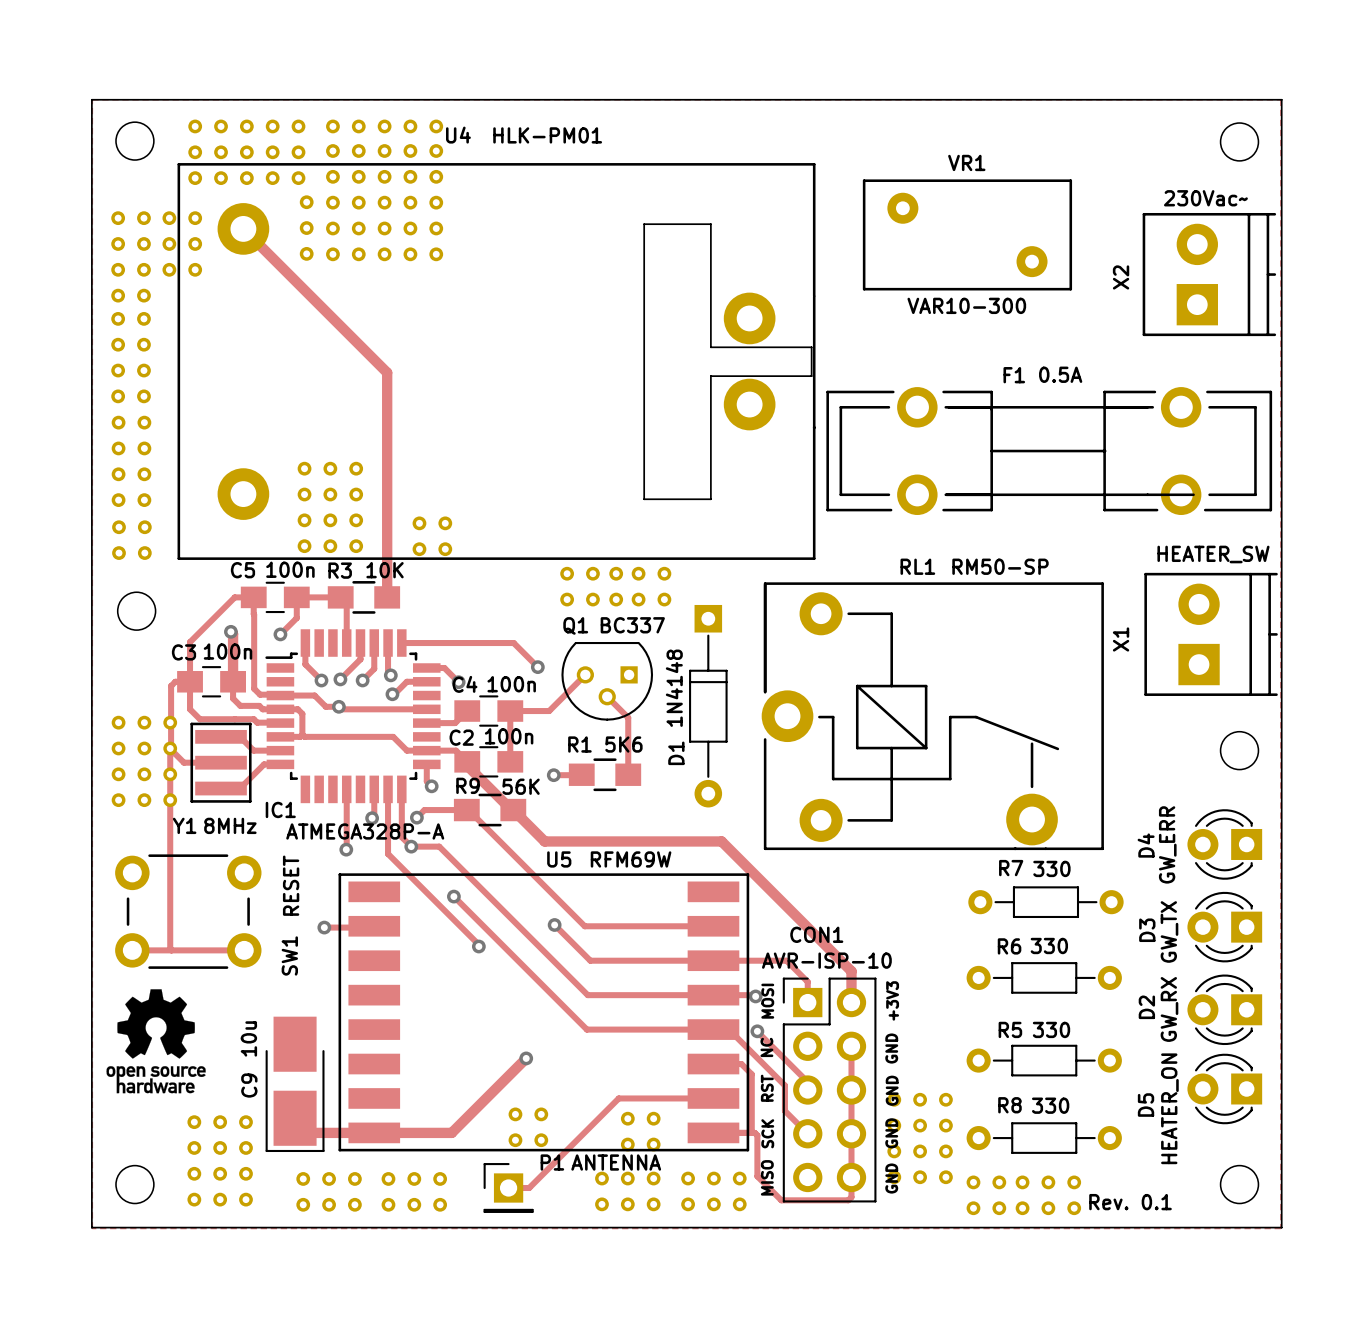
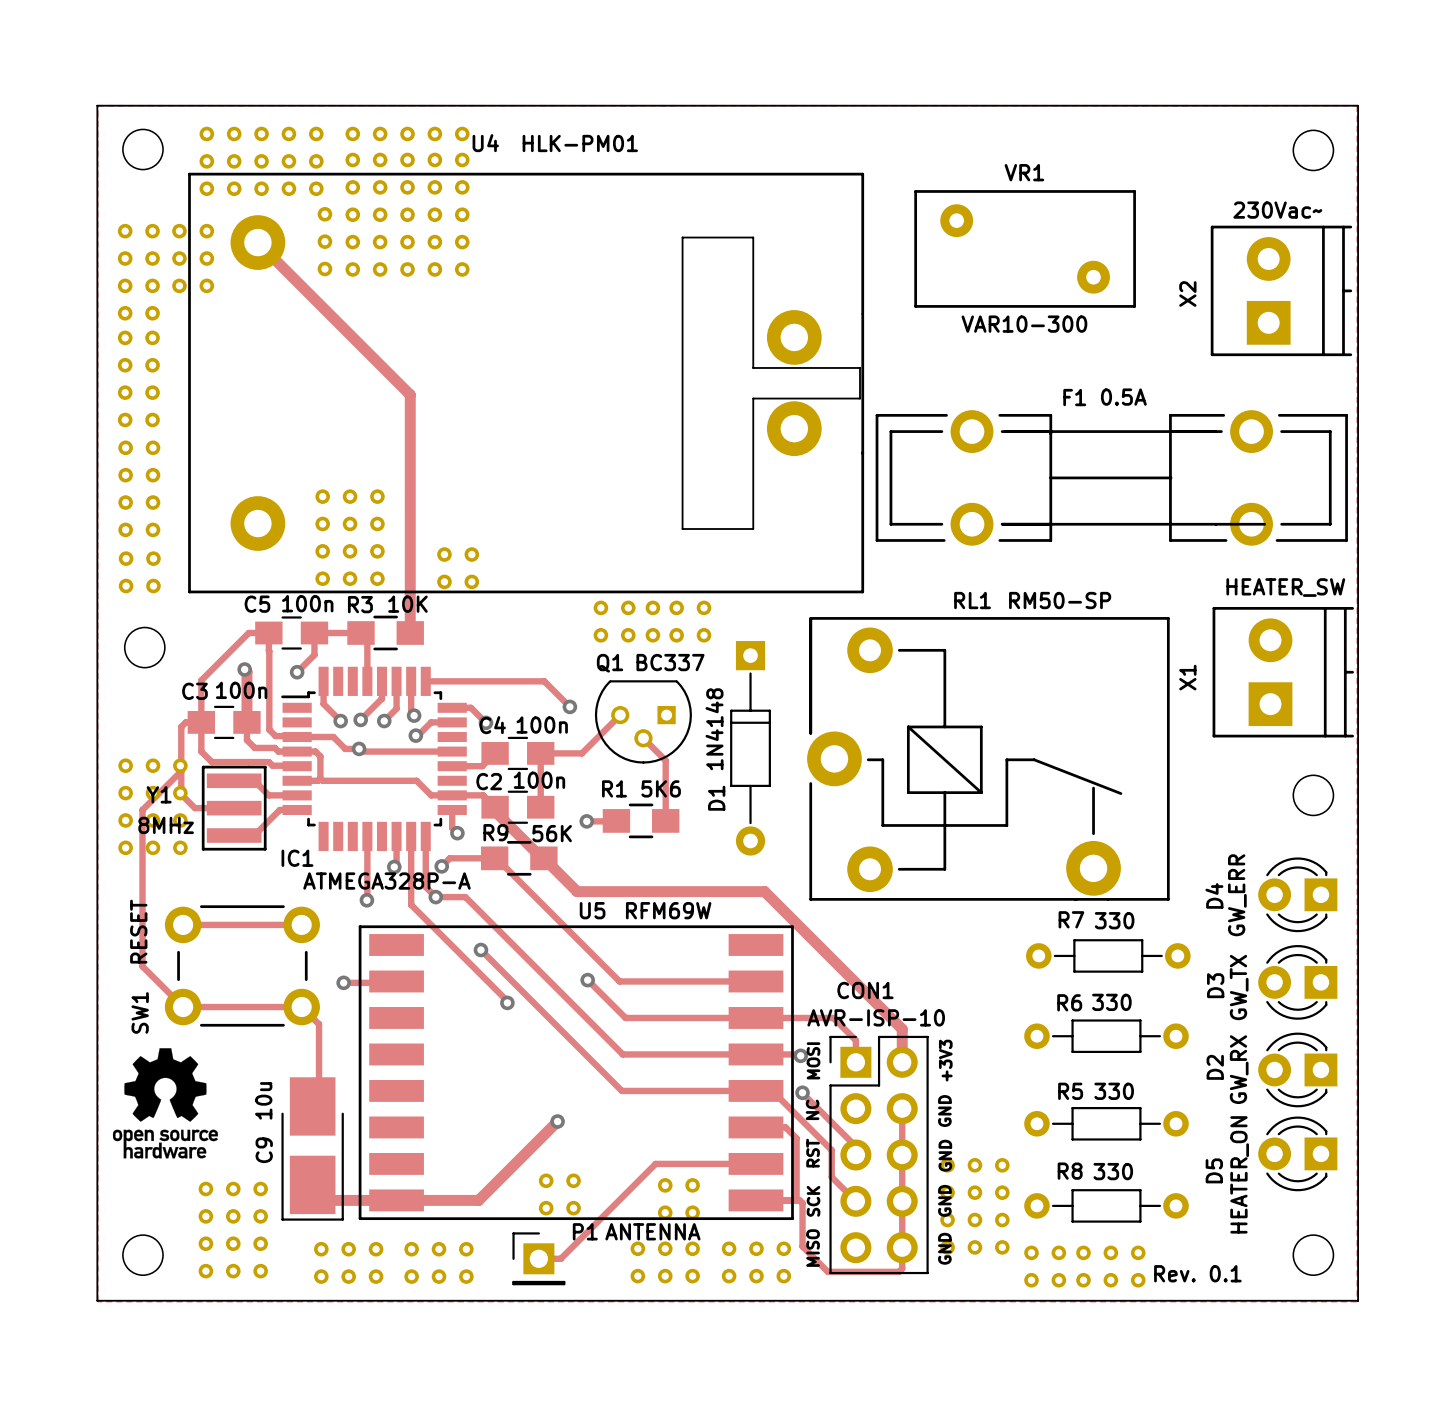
track: (170, 748) (171, 950) -> none
Y1 name position: Y1 (184, 825) -> Y1 (159, 794)
Y1 value position: 8MHz (230, 825) -> 8MHz (166, 825)
track: none -> (183, 924) (301, 924)
SW1 value position: RESET (291, 885) -> RESET (138, 931)
SW1 position: (188, 911) -> (242, 965)
track: (132, 950) (172, 950) -> (181, 771) (142, 809) (142, 966) (183, 1007)
track: none -> (258, 1007) (301, 1007) (319, 1024) (319, 1100)
SW1 name position: SW1 (289, 955) -> SW1 (140, 1012)

